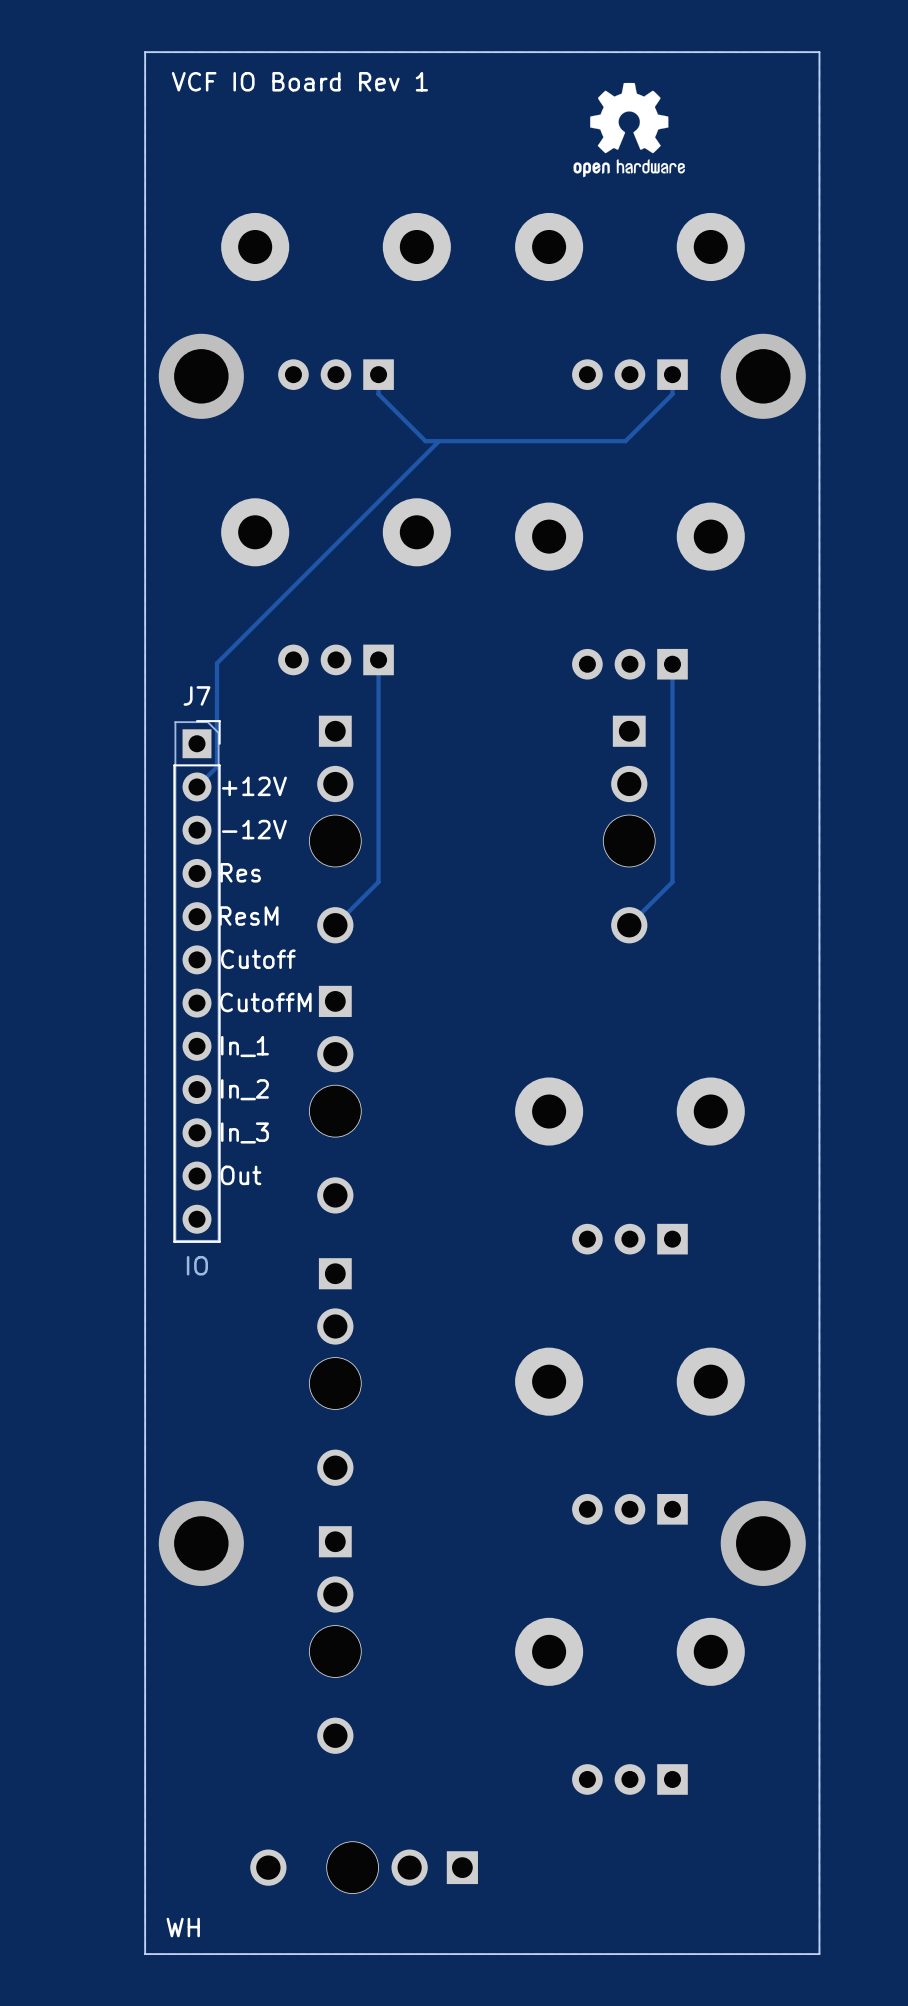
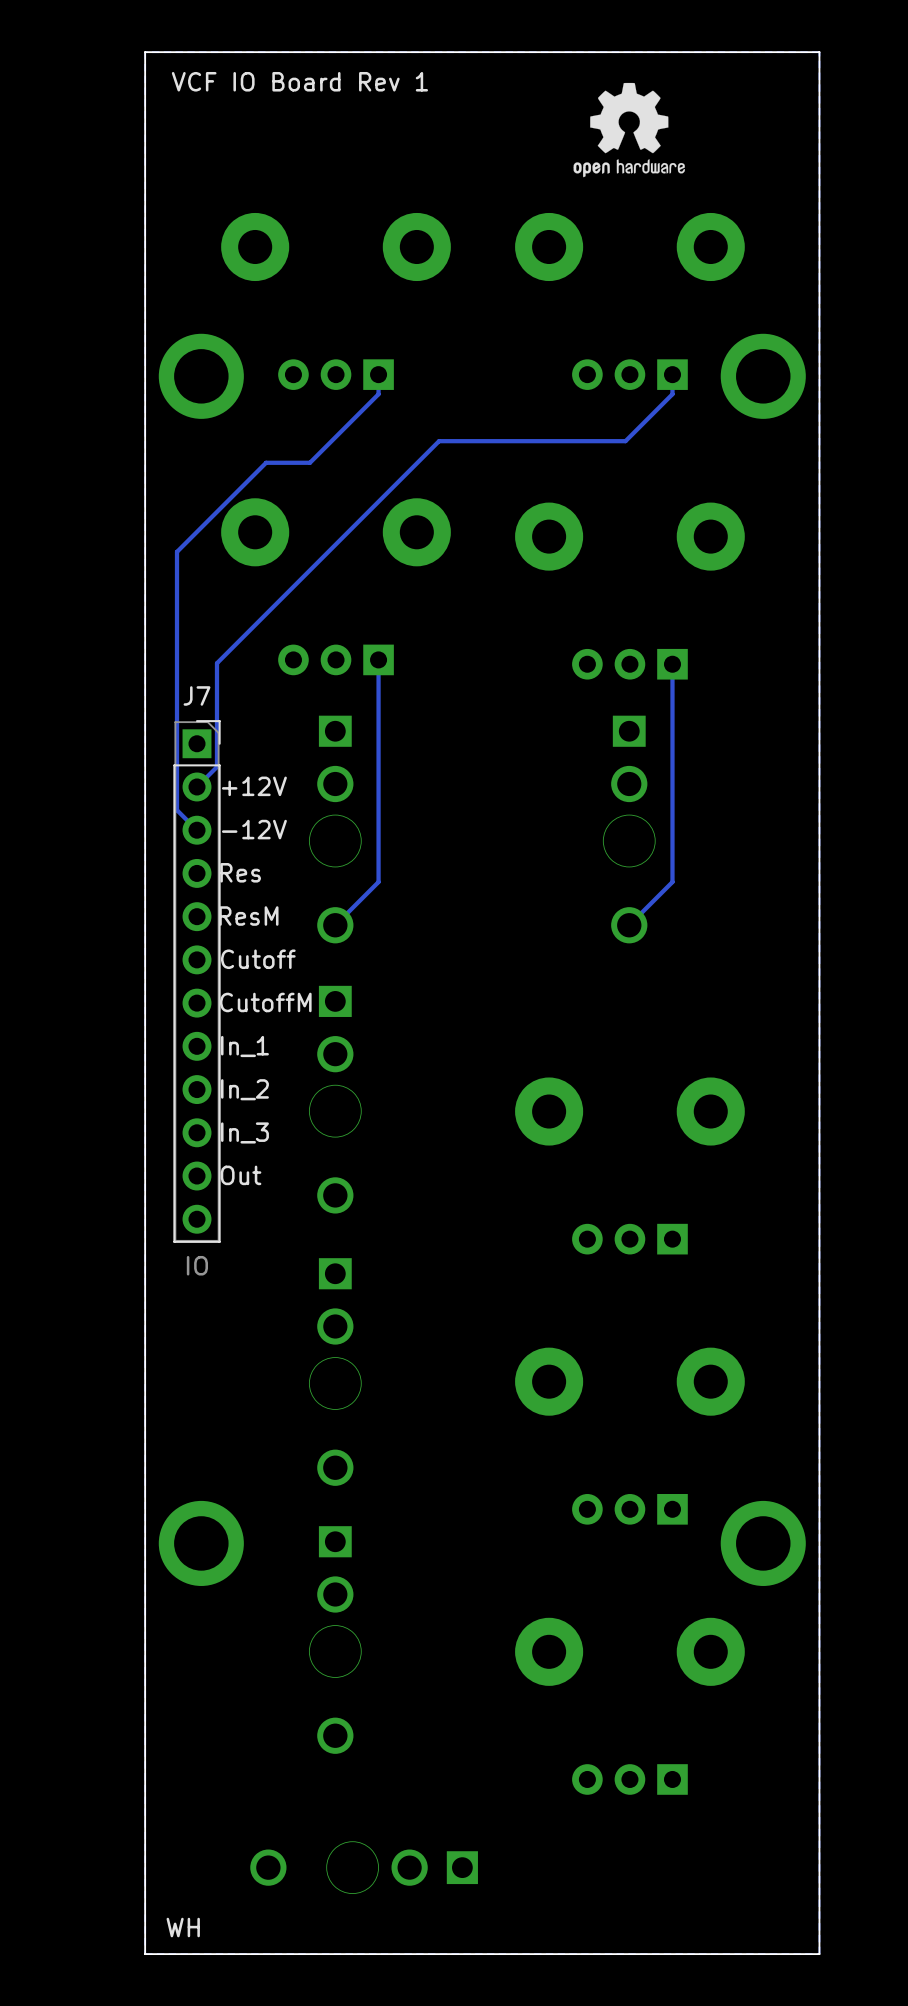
track: (378, 394) (425, 441) (439, 441) -> (378, 394) (309, 462) (266, 462) (177, 551) (177, 810) (197, 830)

